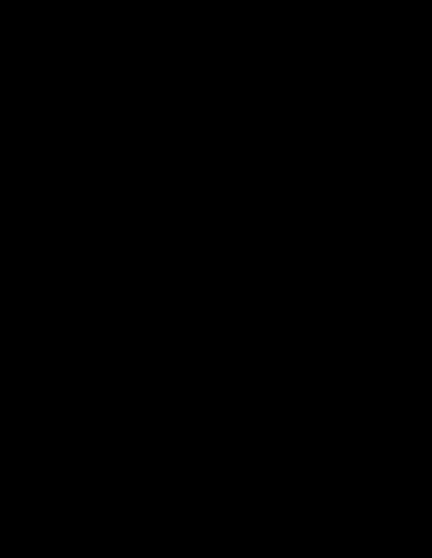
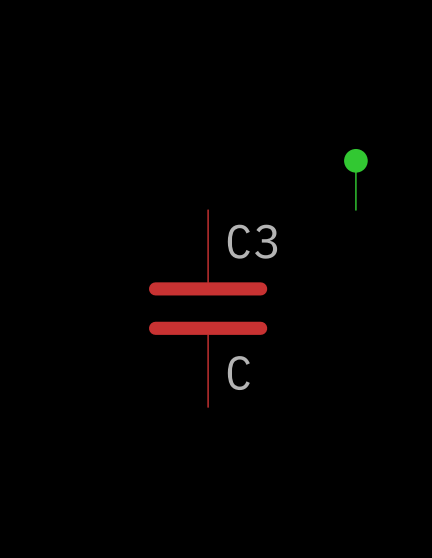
wire: none -> (355, 160) (355, 210)
junction: none -> (355, 160)
C3: none -> C (208, 308)

